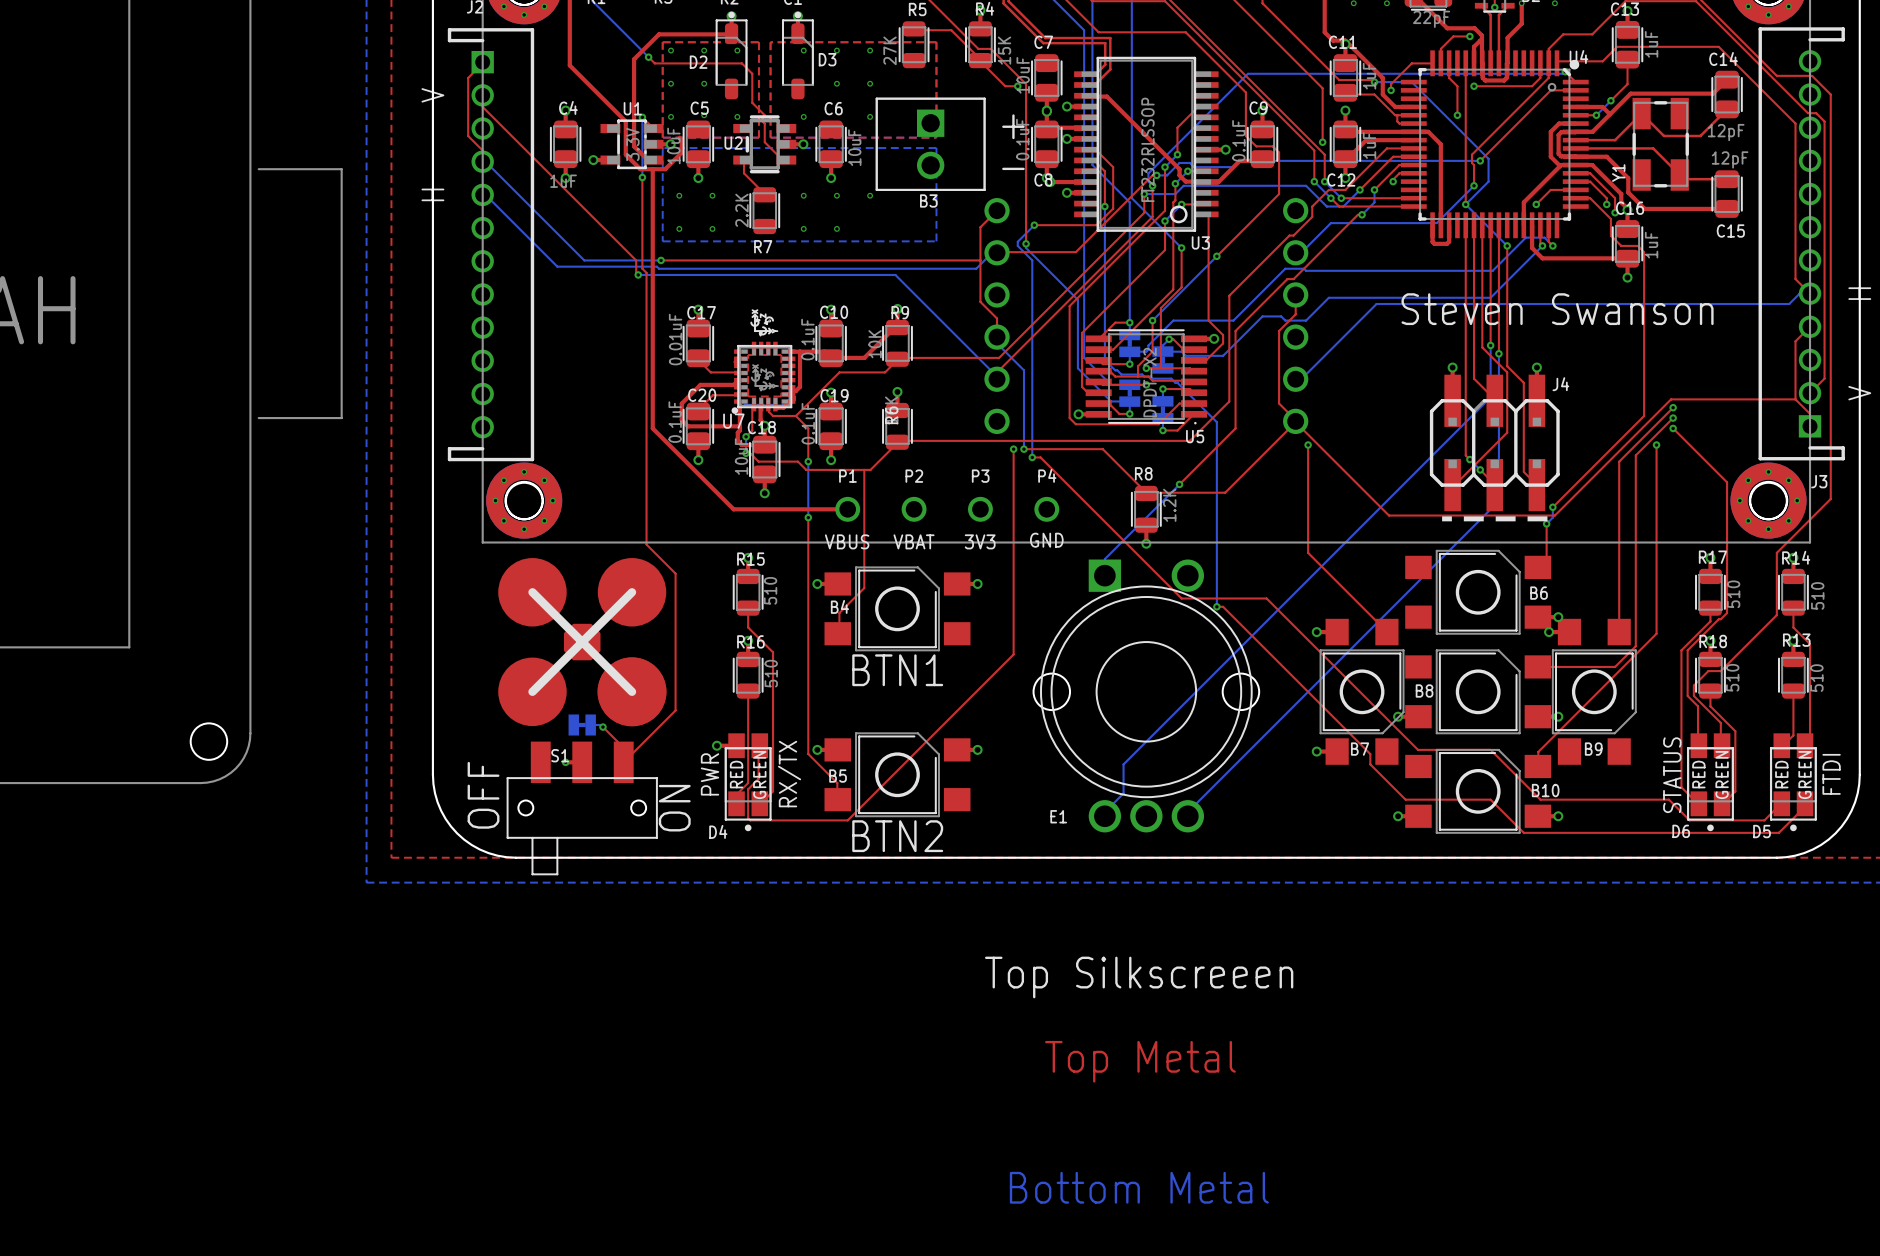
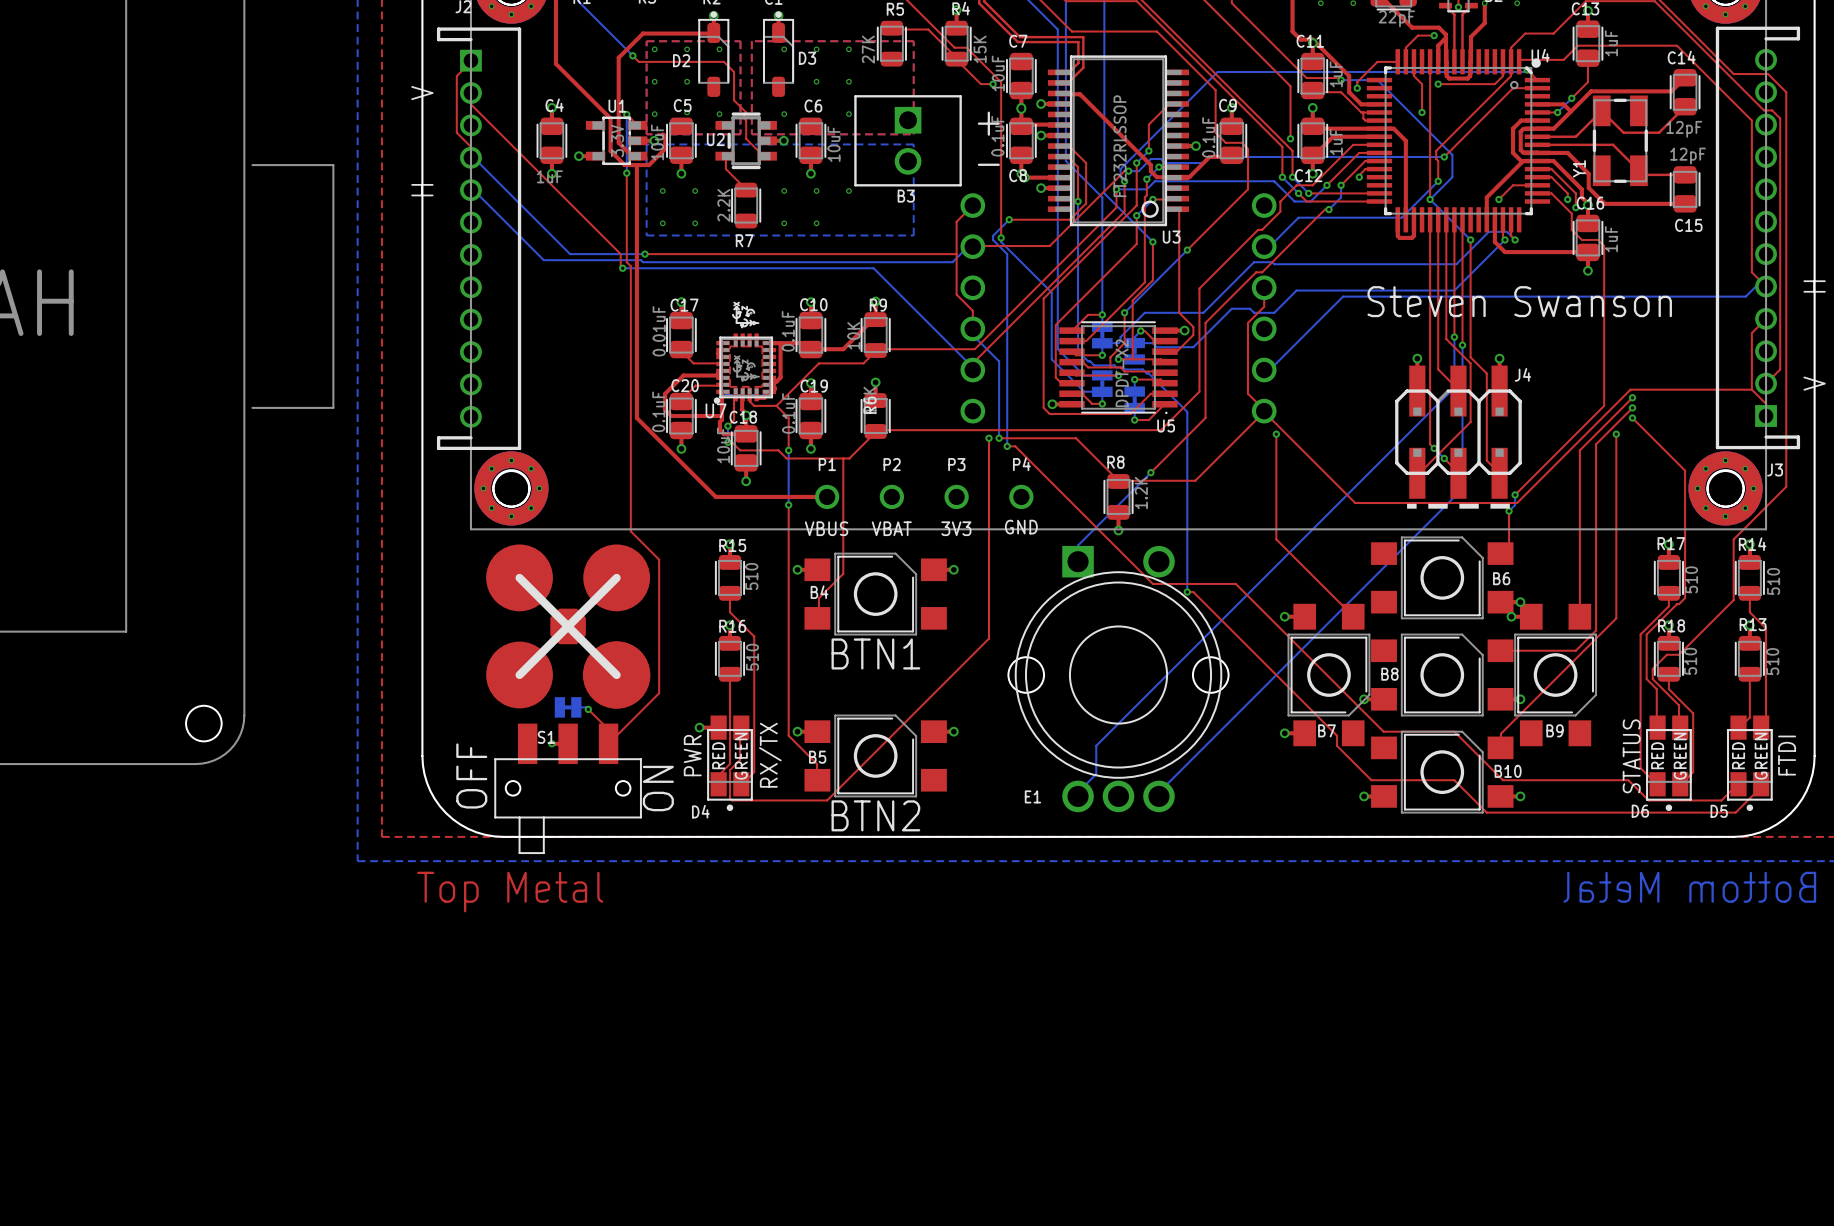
drawing: none -> [417, 871, 1817, 913]
drawing: [984, 956, 1294, 1204] -> none

